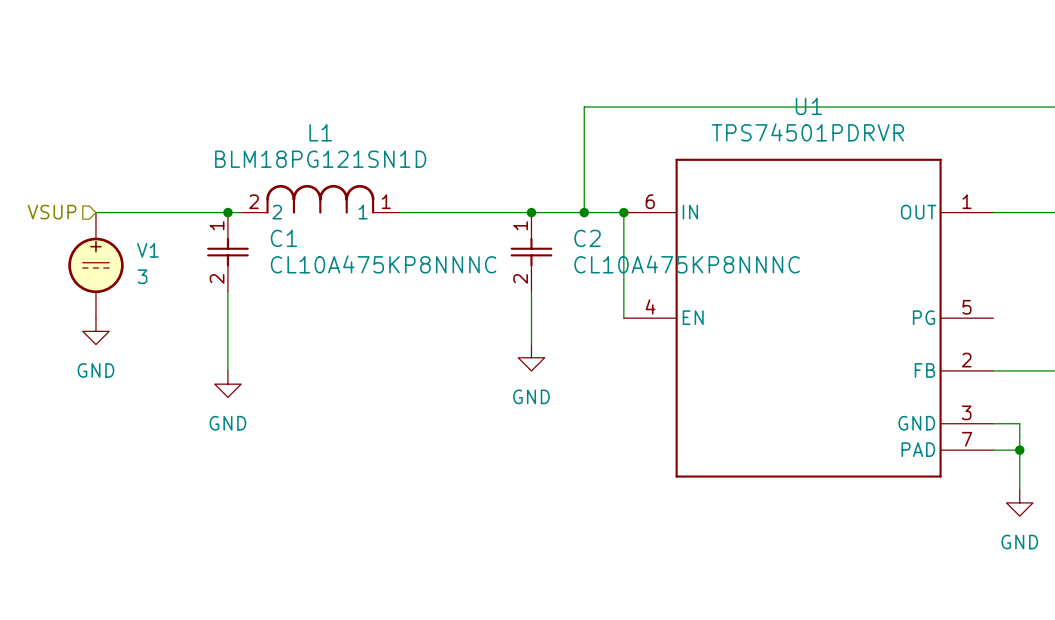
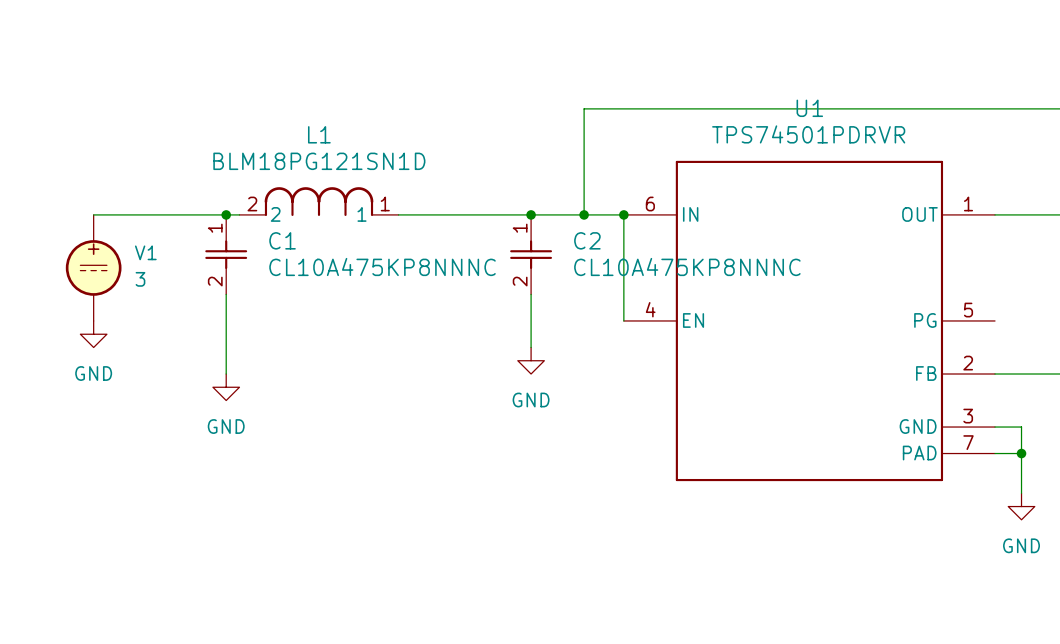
hierarchical label: VSUP (52, 212) -> none

